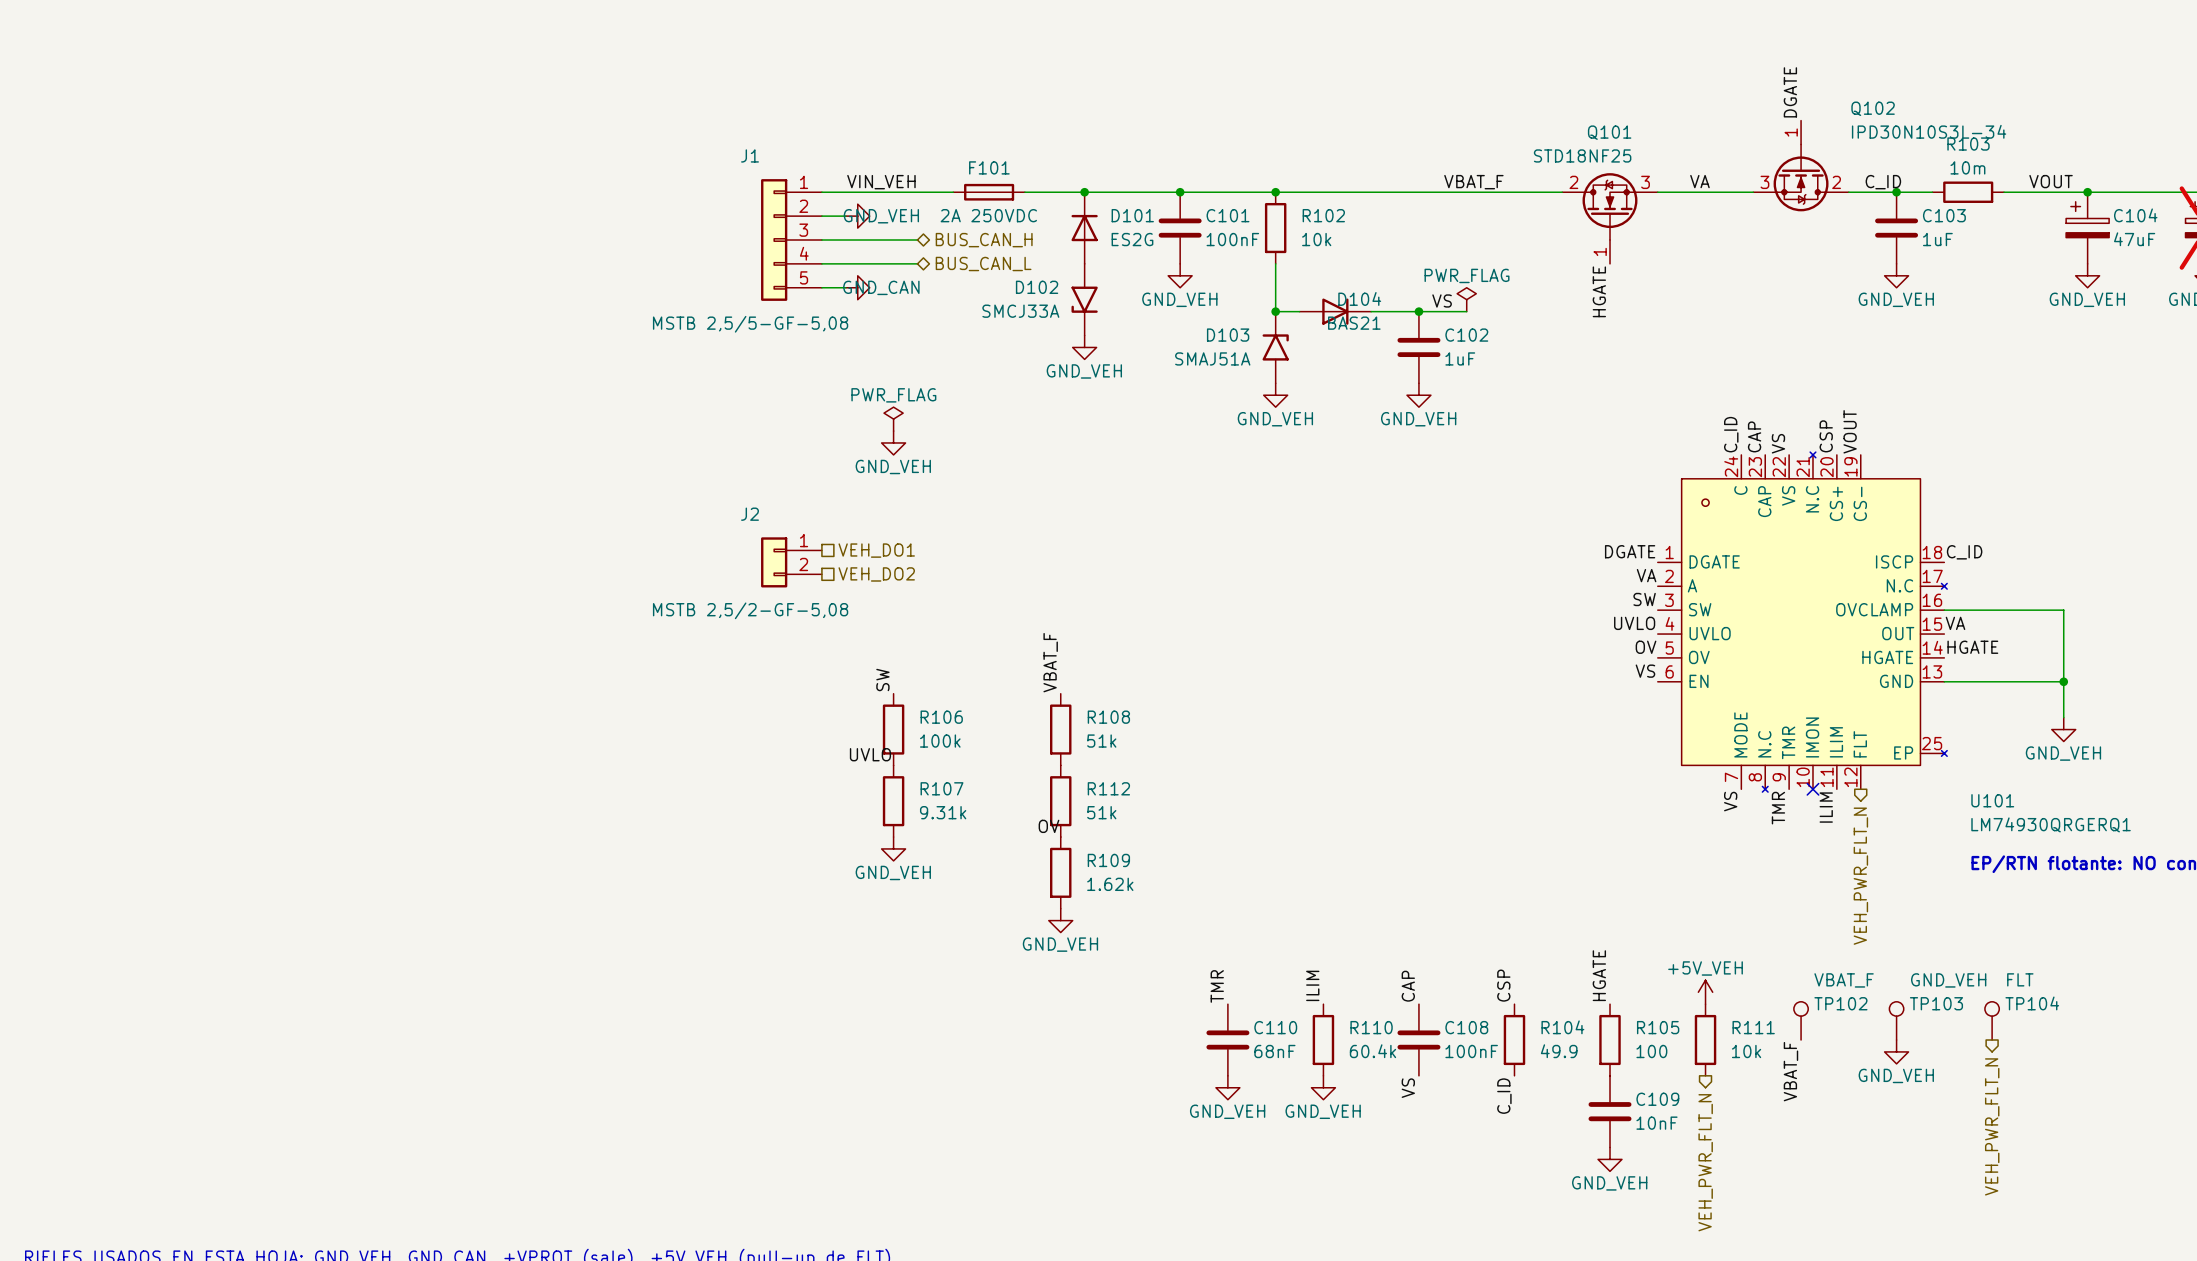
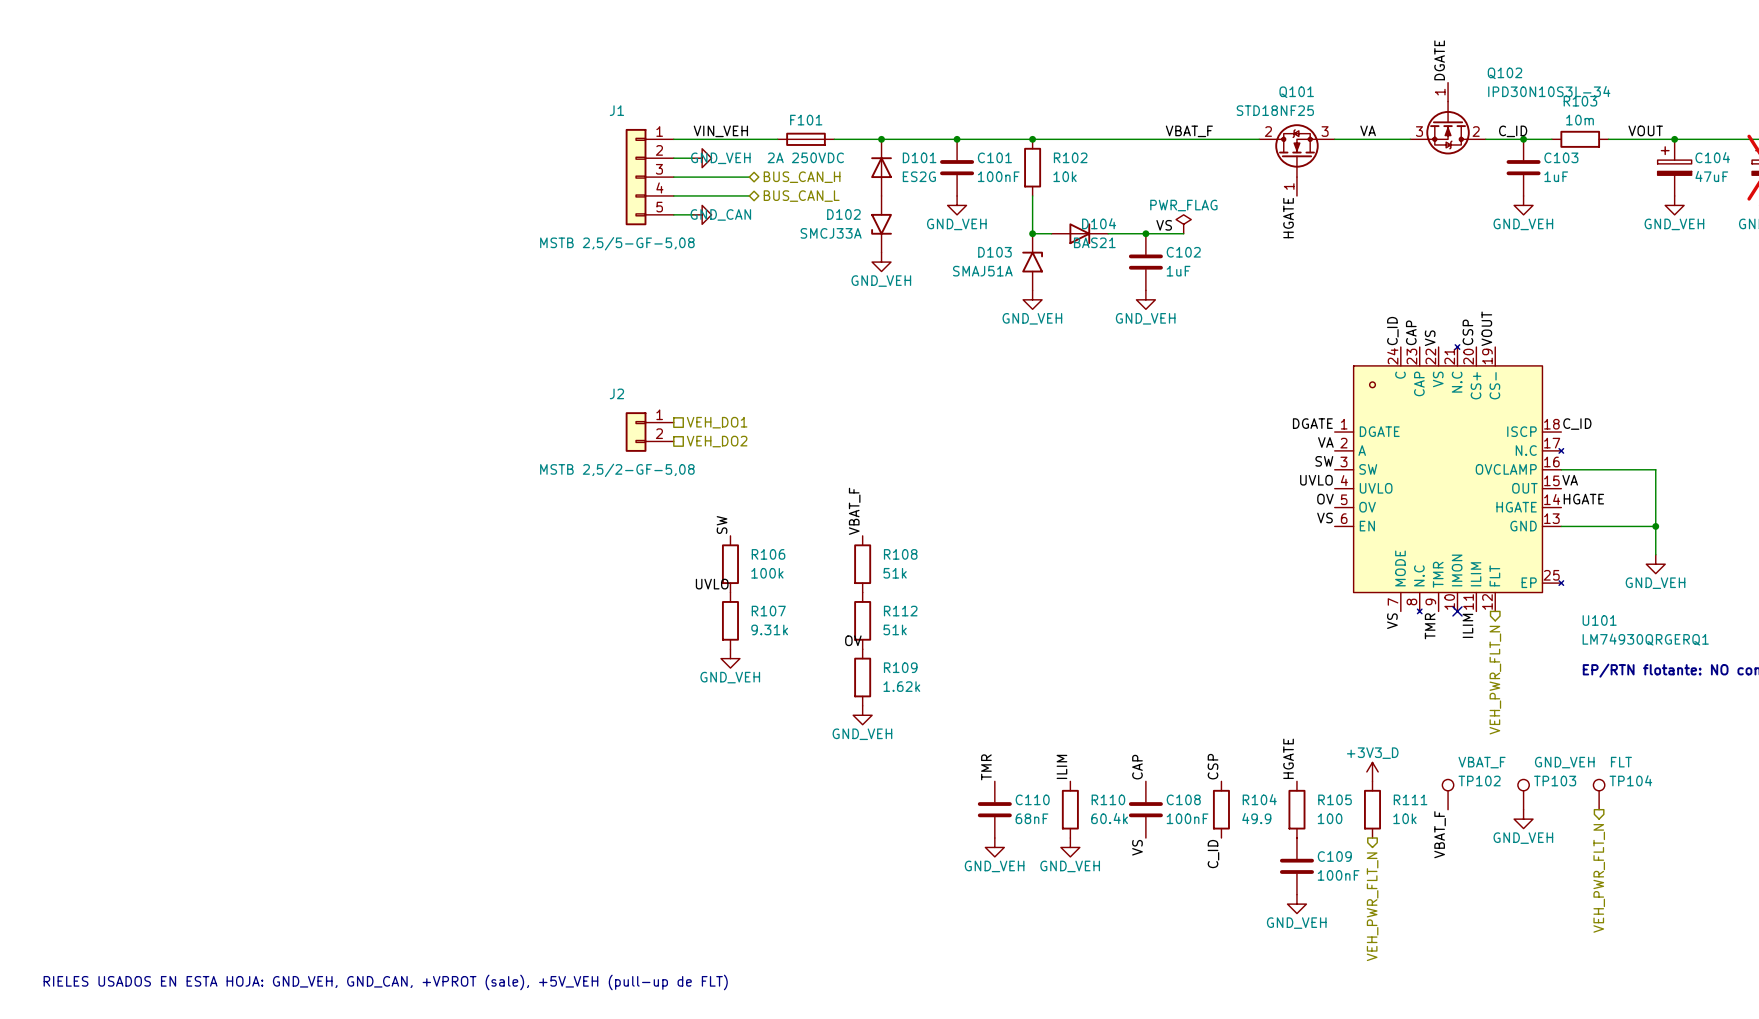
power symbol: PWR_FLAG (893, 419) -> none
power symbol: GND_VEH (893, 442) -> none
power symbol: +5V_VEH (1705, 992) -> +3V3_D (1372, 771)
C109 value: 10nF (1657, 1123) -> 100nF (1338, 875)

